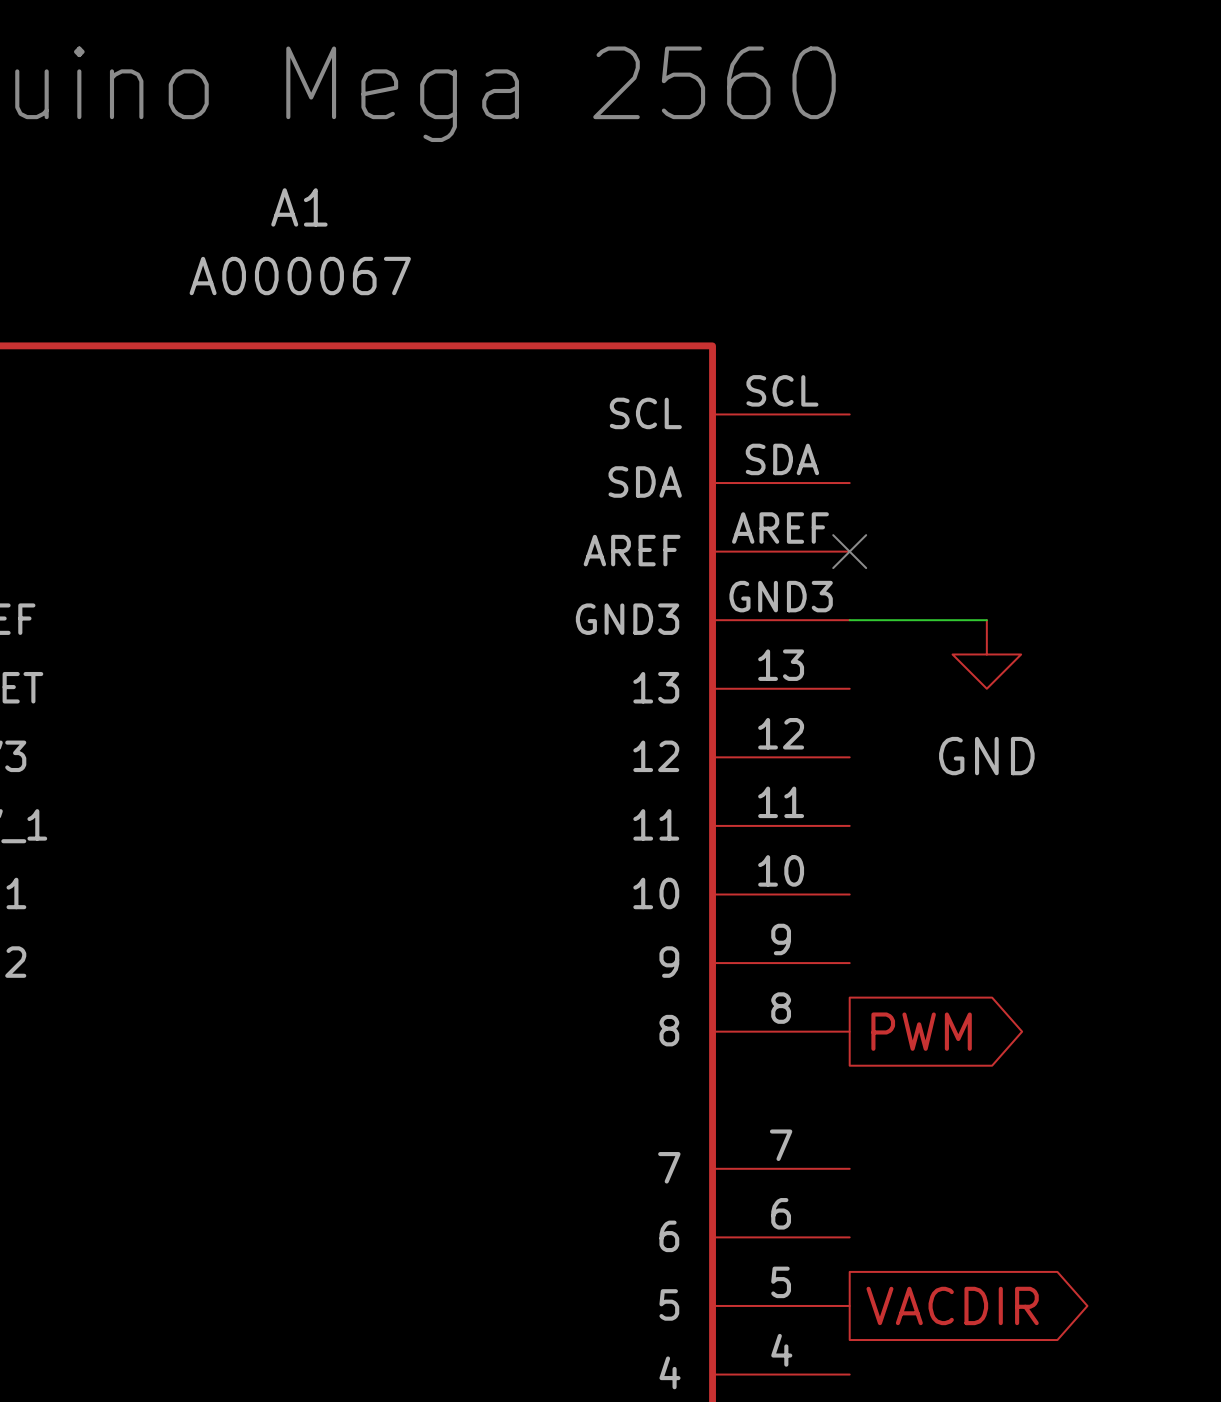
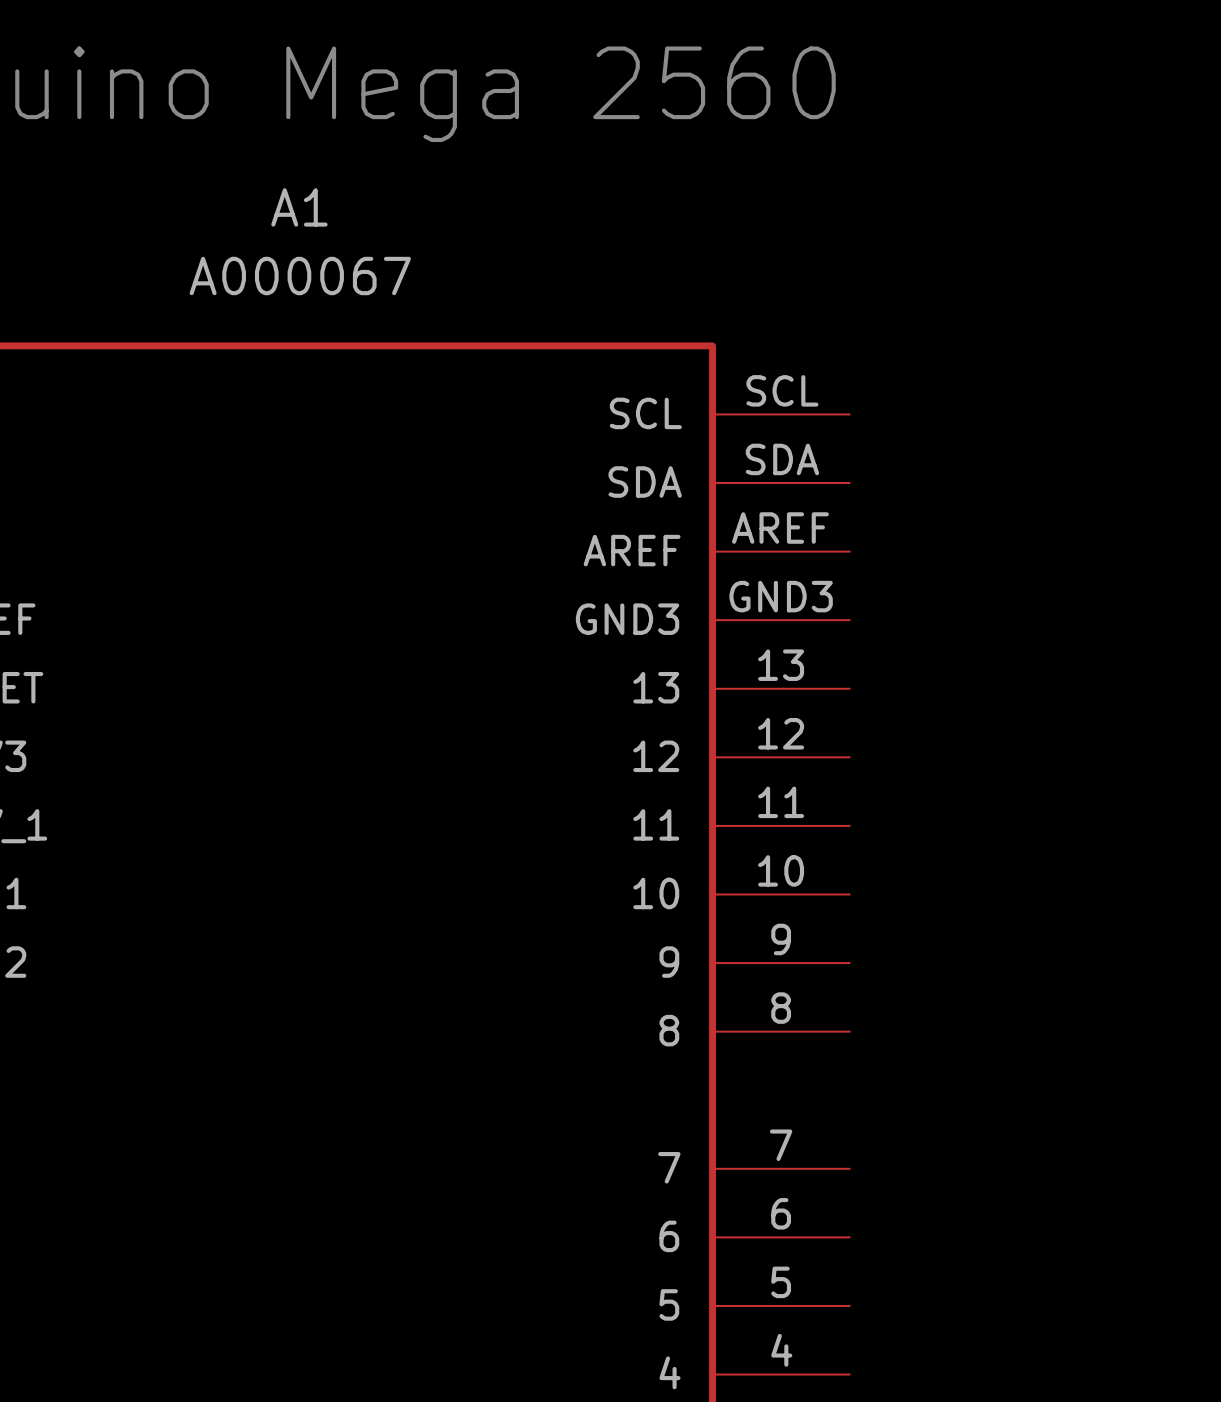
no-connect mark: (849, 551) -> none
wire: (849, 620) (986, 620) -> none
power symbol: GND (986, 654) -> none
global label: PWM (921, 1031) -> none
global label: VACDIR (952, 1305) -> none

